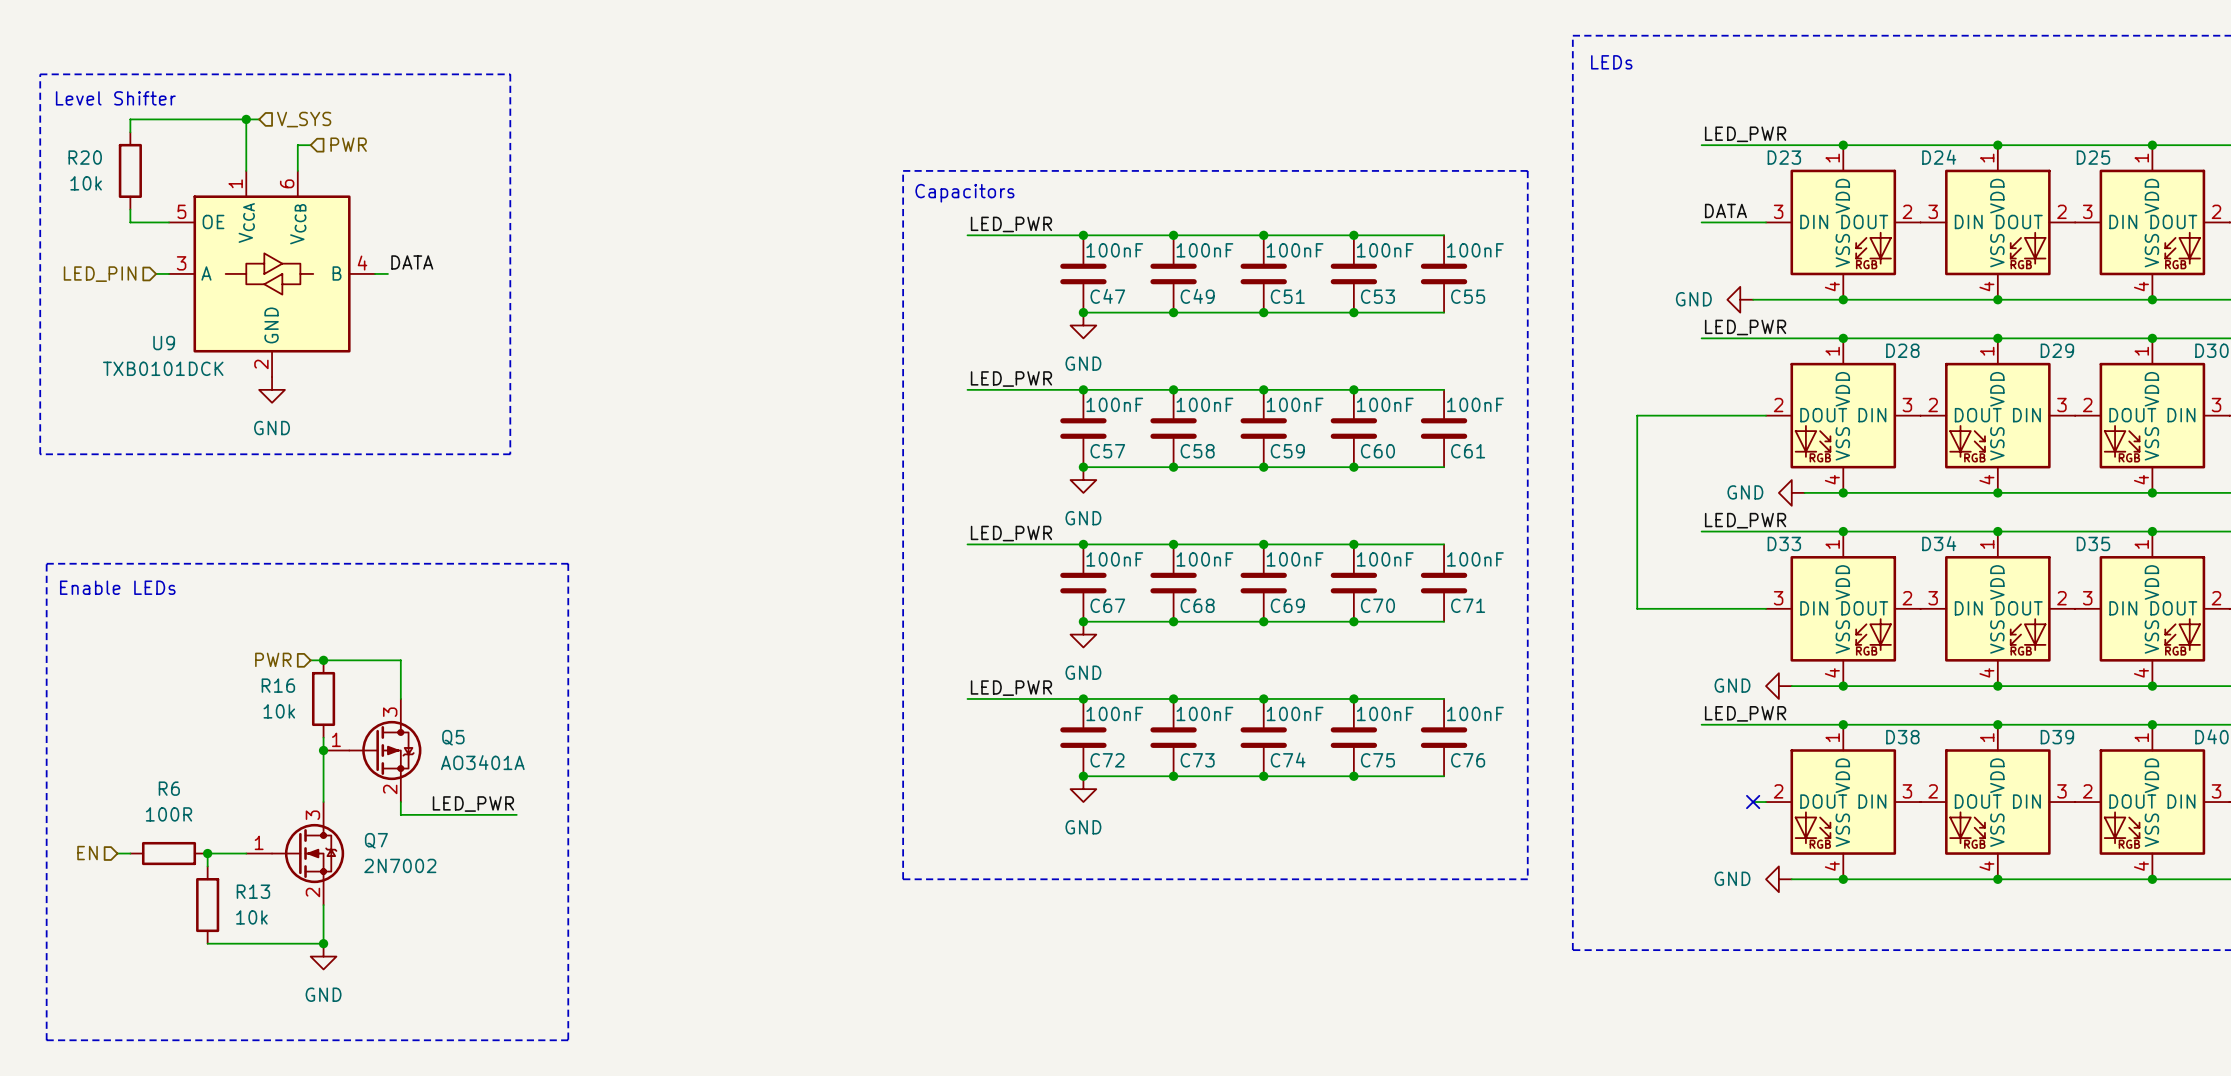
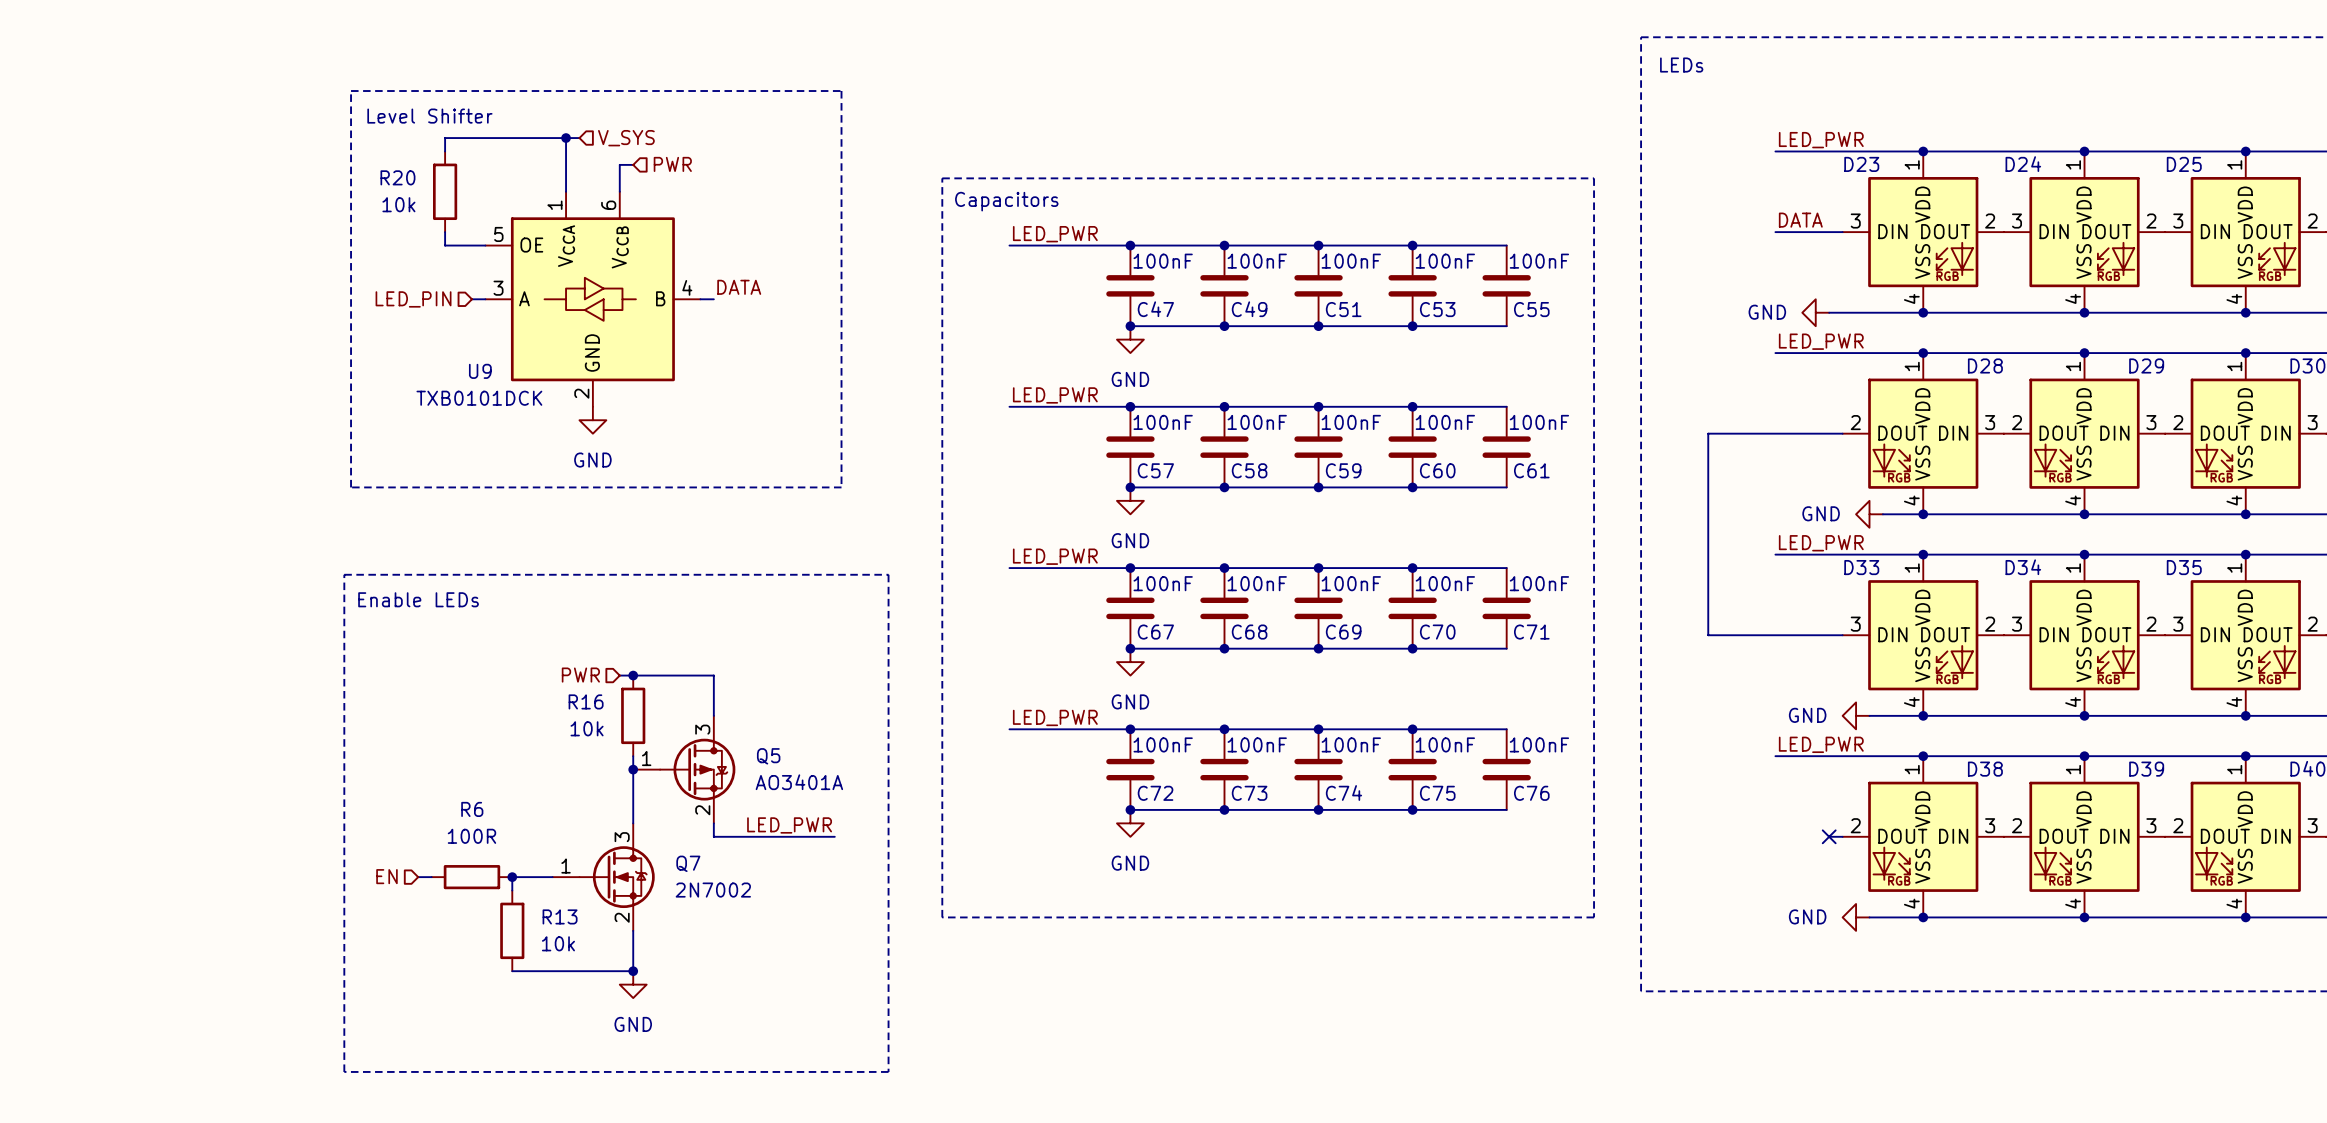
line: (40, 74) (510, 74) (510, 454) (40, 454) (40, 74) -> none
line: none -> (351, 91) (841, 91) (841, 487) (351, 487) (351, 91)
text: Level Shifter (115, 98) -> none
text: none -> Level Shifter (429, 116)
wire: (246, 119) (246, 170) -> none
junction: (246, 119) -> none
wire: (259, 119) (130, 119) (130, 132) -> none
hierarchical label: V_SYS (304, 119) -> none
wire: none -> (566, 138) (566, 191)
junction: none -> (566, 138)
wire: none -> (579, 138) (445, 138) (445, 151)
hierarchical label: none -> V_SYS (626, 138)
hierarchical label: PWR (348, 144) -> none
wire: (310, 145) (297, 145) (297, 170) -> none
hierarchical label: none -> PWR (672, 164)
wire: none -> (633, 164) (619, 164) (619, 191)
R20 position: (130, 170) -> (445, 191)
wire: (130, 209) (130, 222) (169, 222) -> none
wire: none -> (445, 232) (445, 245) (485, 245)
label: DATA (412, 262) -> none
wire: (156, 273) (169, 273) -> none
U9 position: (272, 273) -> (592, 299)
wire: (375, 273) (387, 273) -> (471, 299) (485, 299)
hierarchical label: LED_PIN (100, 274) -> none
label: none -> DATA (739, 287)
hierarchical label: none -> LED_PIN (413, 299)
wire: none -> (700, 299) (713, 299)
power symbol: GND (272, 389) -> none
power symbol: none -> GND (592, 420)
line: none -> (344, 574) (888, 574) (888, 1071) (344, 1071) (344, 574)
line: (46, 563) (568, 563) (568, 1040) (46, 1040) (46, 563) -> none
text: none -> Enable LEDs (418, 599)
text: Enable LEDs (117, 587) -> none
hierarchical label: none -> PWR (580, 675)
wire: none -> (619, 675) (713, 675) (713, 715)
junction: none -> (633, 675)
hierarchical label: PWR (273, 659) -> none
wire: (310, 660) (400, 660) (400, 698) -> none
junction: (323, 660) -> none
R16 position: (323, 698) -> (633, 715)
wire: none -> (633, 756) (633, 823)
wire: (323, 737) (323, 802) -> none
junction: none -> (633, 769)
junction: (323, 750) -> none
Q5 position: (372, 750) -> (684, 769)
wire: none -> (713, 823) (713, 836) (834, 836)
label: none -> LED_PWR (789, 825)
wire: (400, 802) (400, 814) (516, 814) -> none
label: LED_PWR (473, 804) -> none
hierarchical label: none -> EN (386, 876)
wire: none -> (418, 877) (431, 877)
junction: none -> (512, 877)
wire: none -> (552, 877) (512, 877) (512, 890)
hierarchical label: EN (87, 853) -> none
wire: (117, 853) (130, 853) -> none
R6 position: (169, 853) -> (471, 877)
junction: (207, 853) -> none
wire: (246, 853) (207, 853) (207, 866) -> none
Q7 position: (295, 853) -> (603, 877)
wire: none -> (633, 930) (633, 971) (512, 971)
R13 position: (207, 905) -> (512, 930)
wire: (323, 905) (323, 943) (207, 943) -> none
junction: none -> (633, 971)
junction: (323, 943) -> none
power symbol: none -> GND (633, 984)
power symbol: GND (323, 956) -> none

